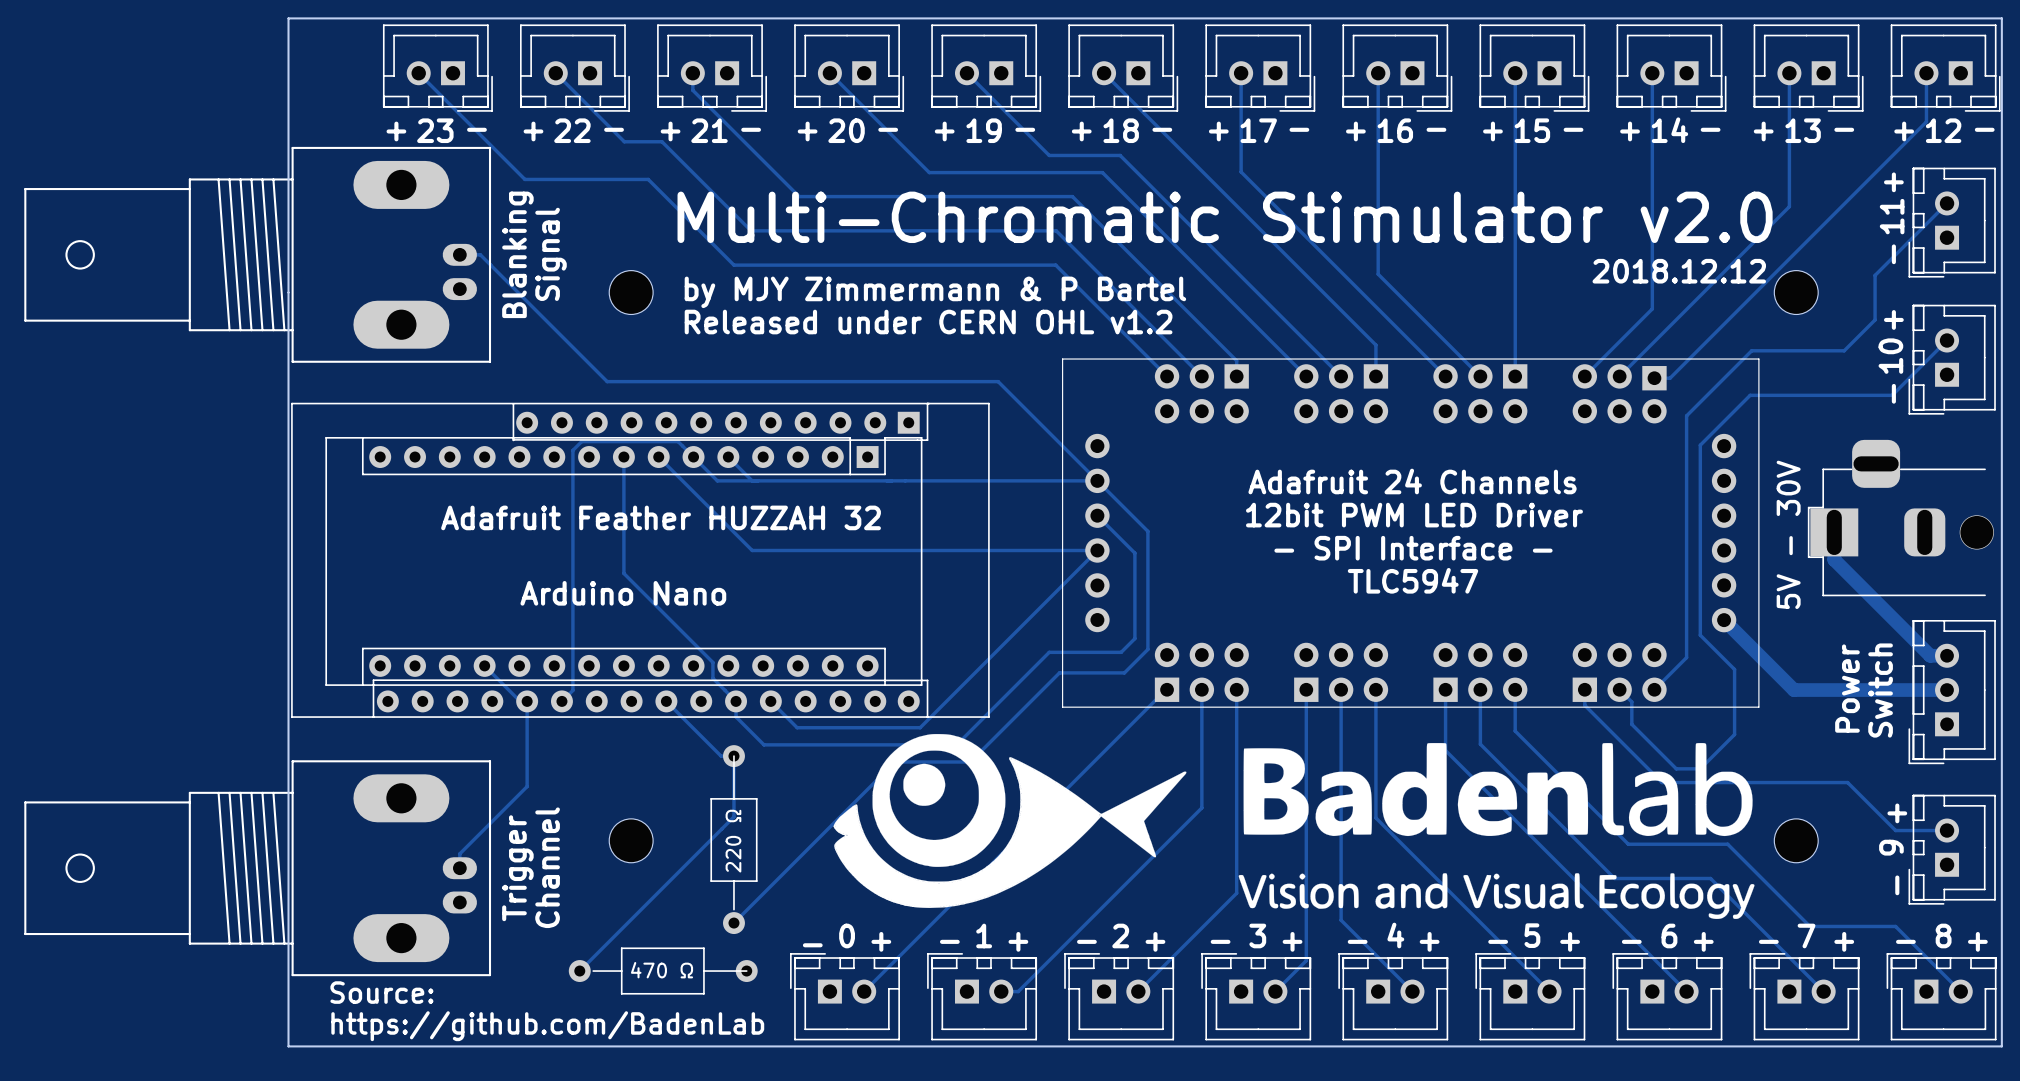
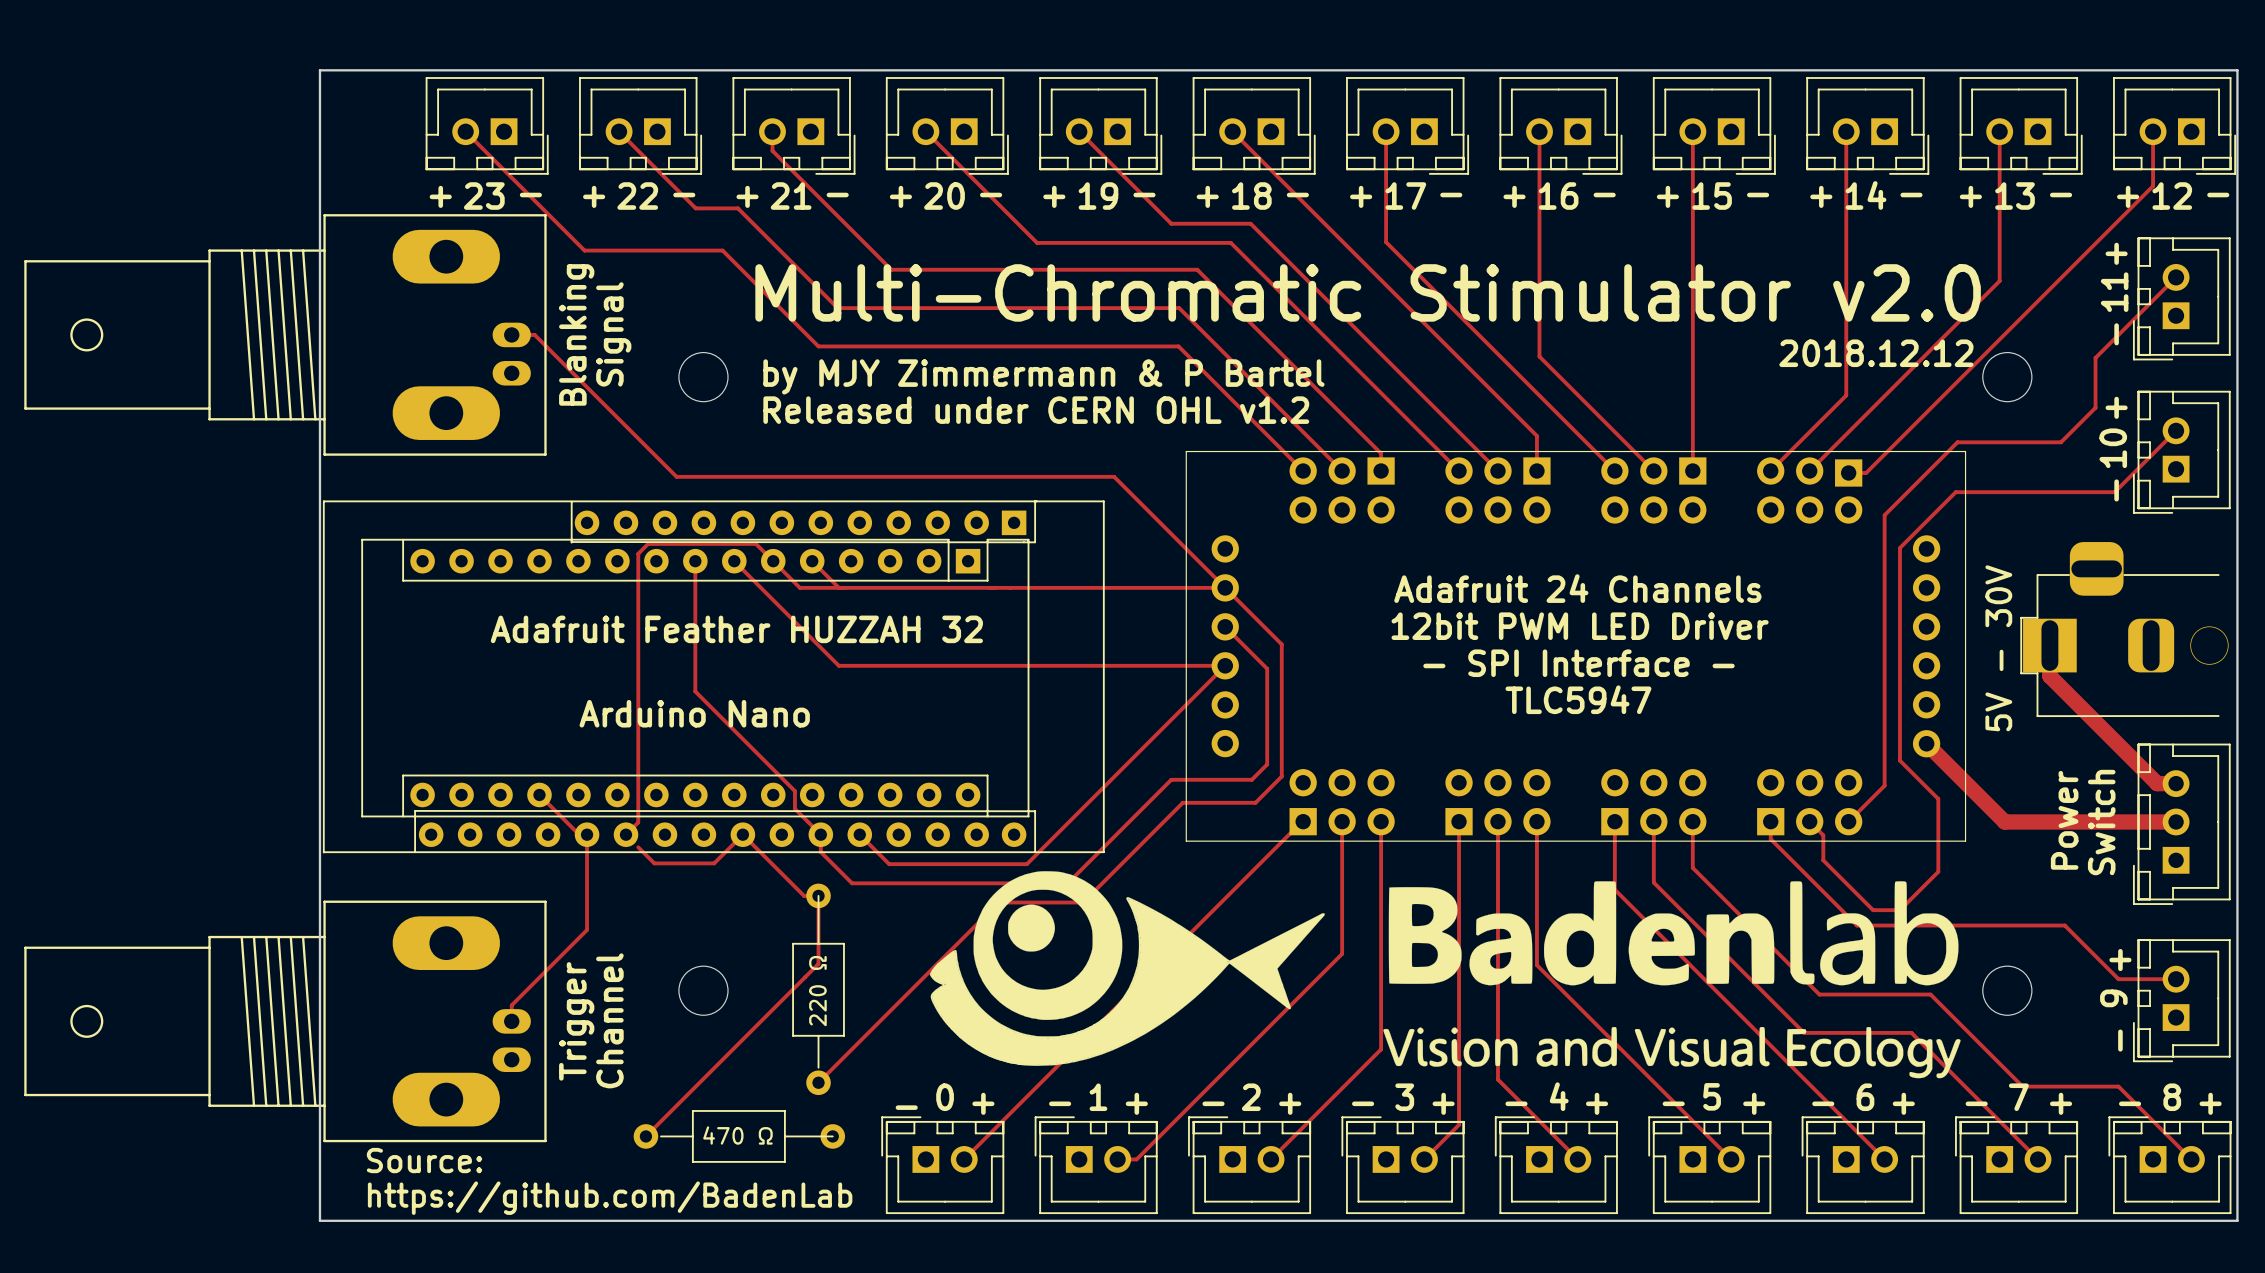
track: none -> (742, 834) (714, 863) (654, 863) (638, 847)

